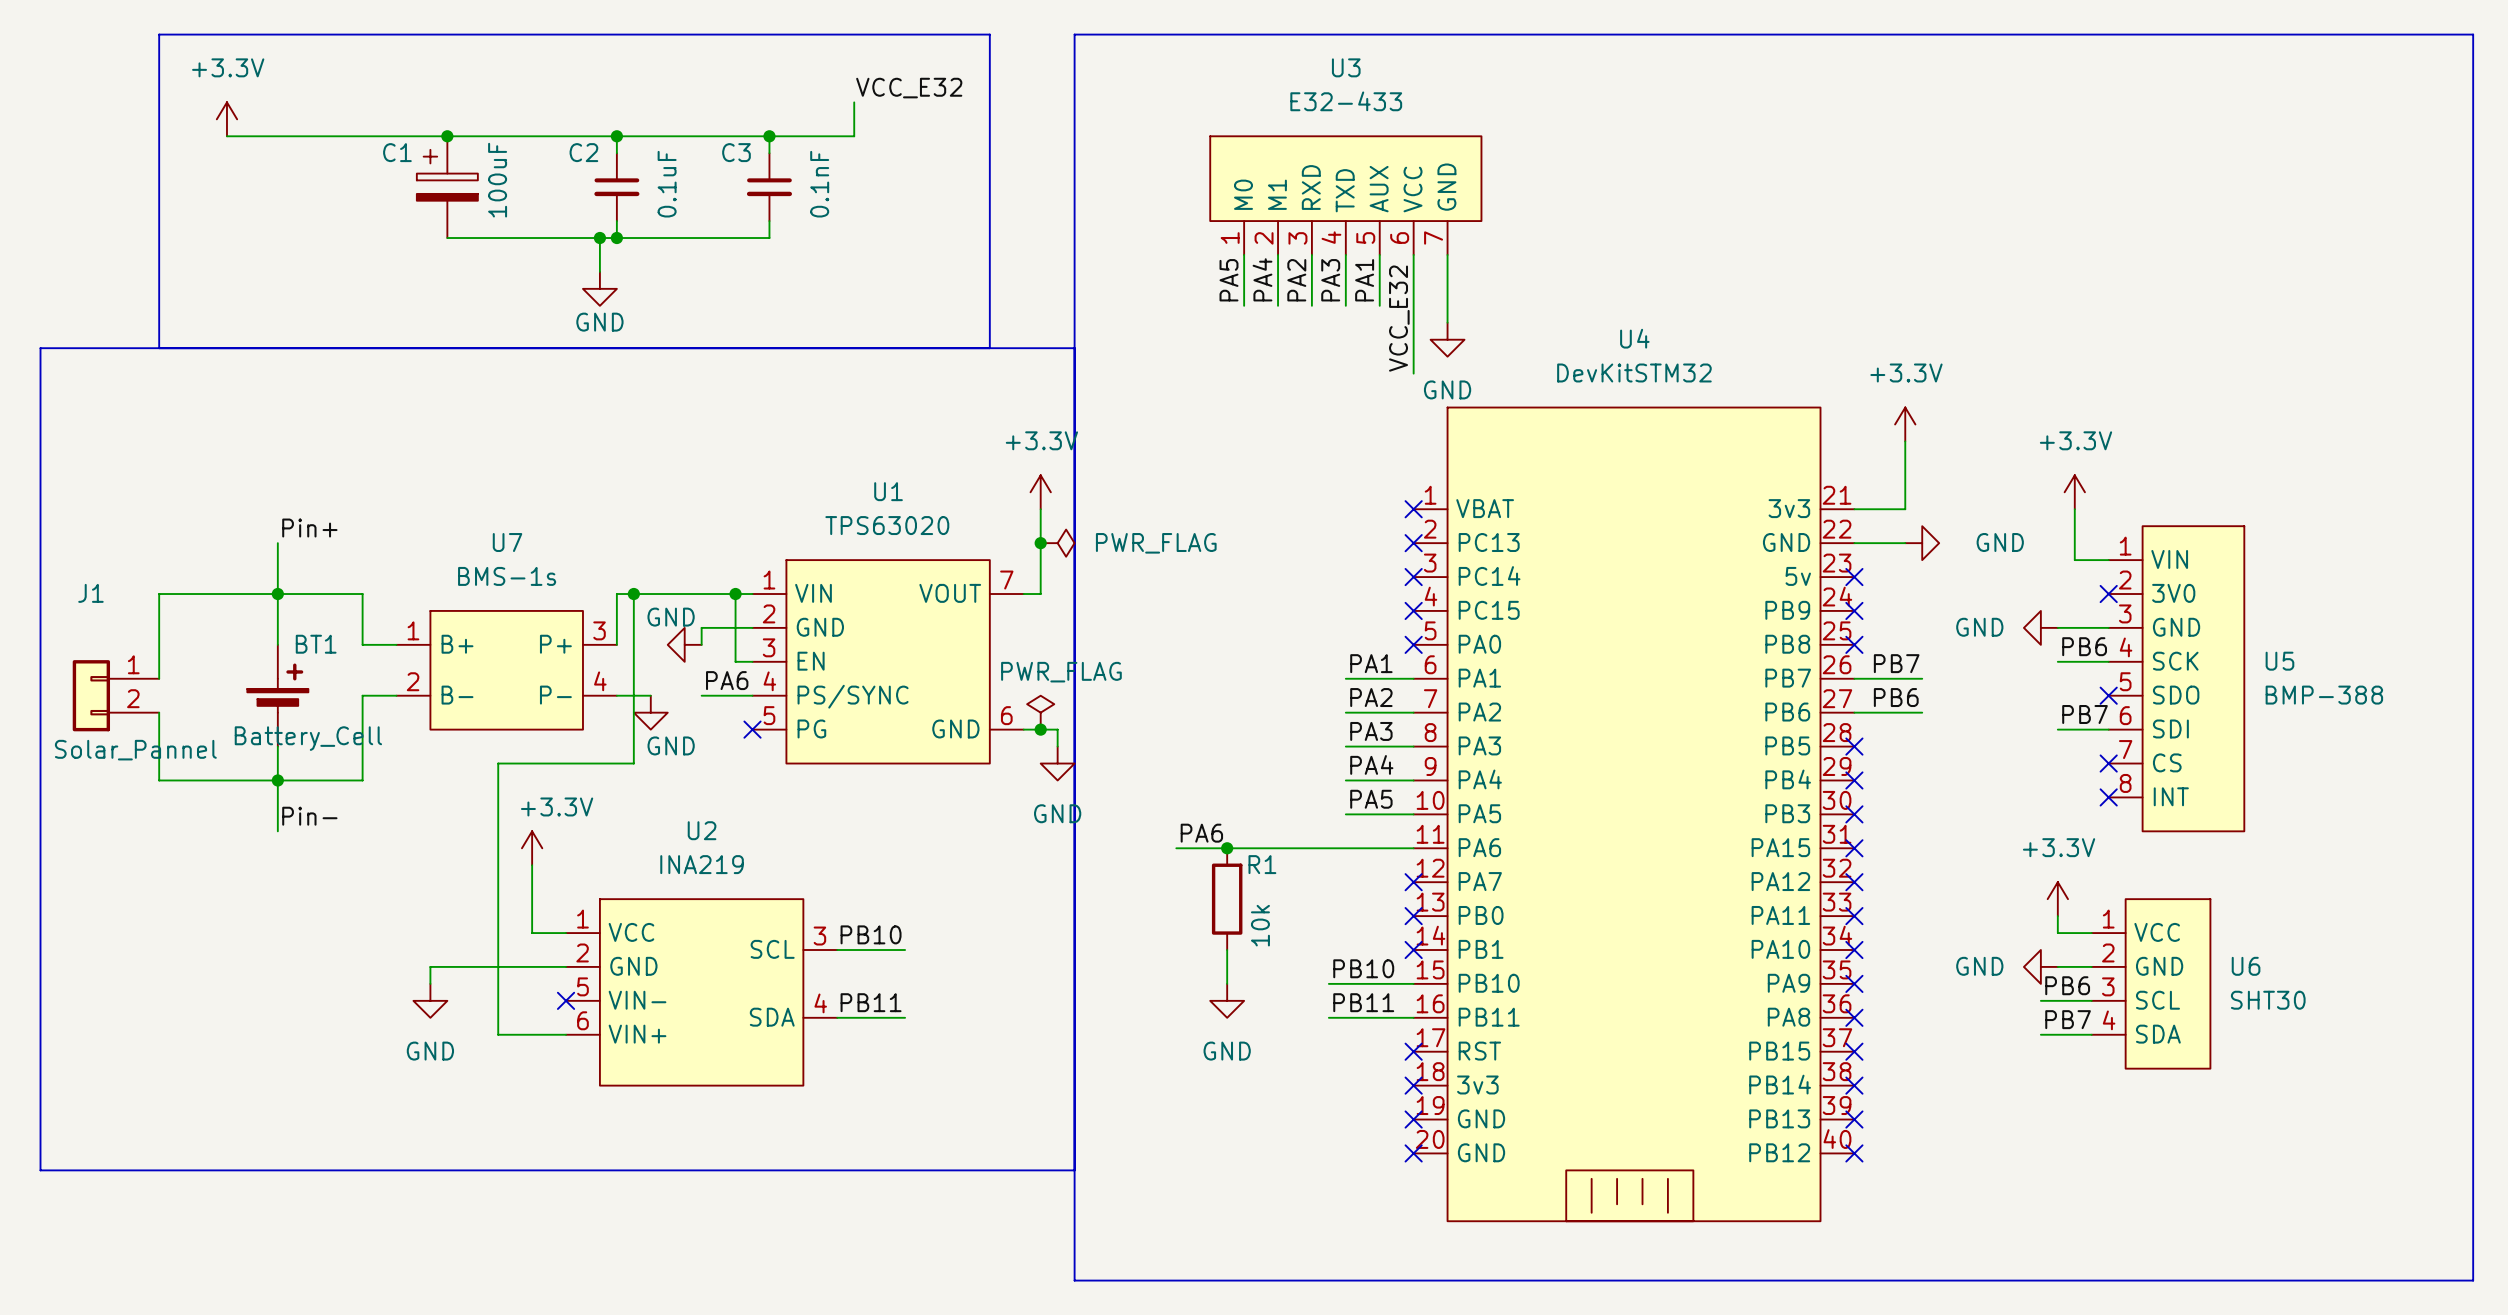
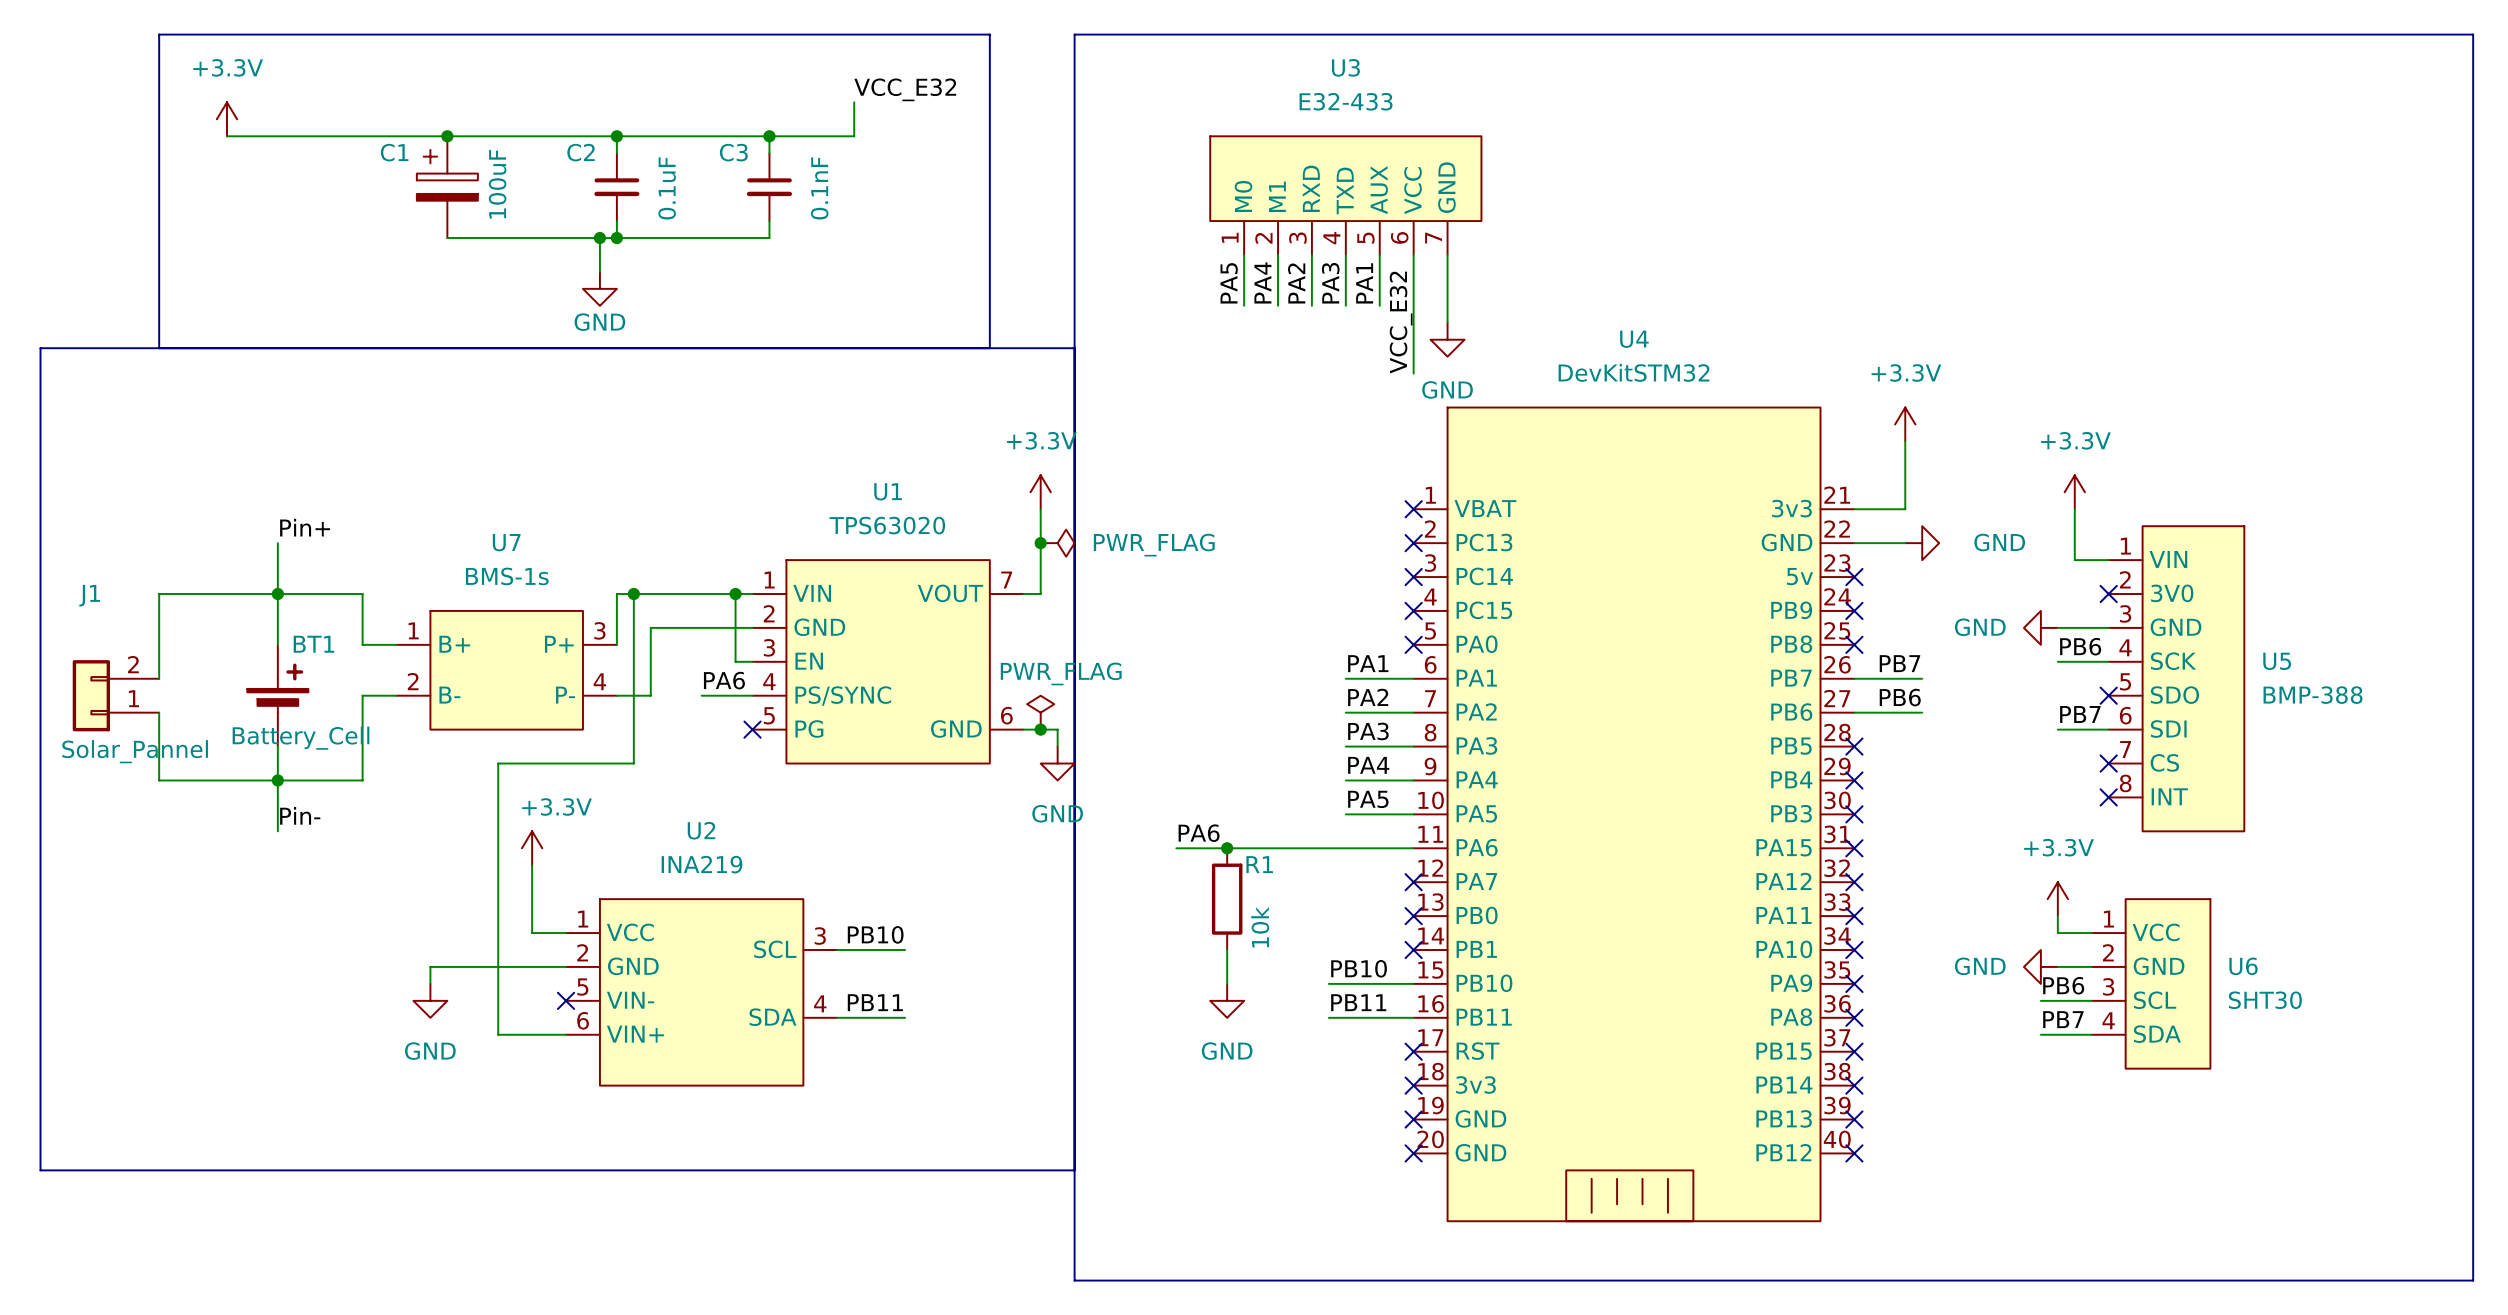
wire: (701, 627) (701, 644) -> (701, 627) (650, 627) (650, 695)
power symbol: GND (684, 644) -> none
J1 flip: as is (91, 695) -> up-down (91, 695)
power symbol: GND (650, 712) -> none

